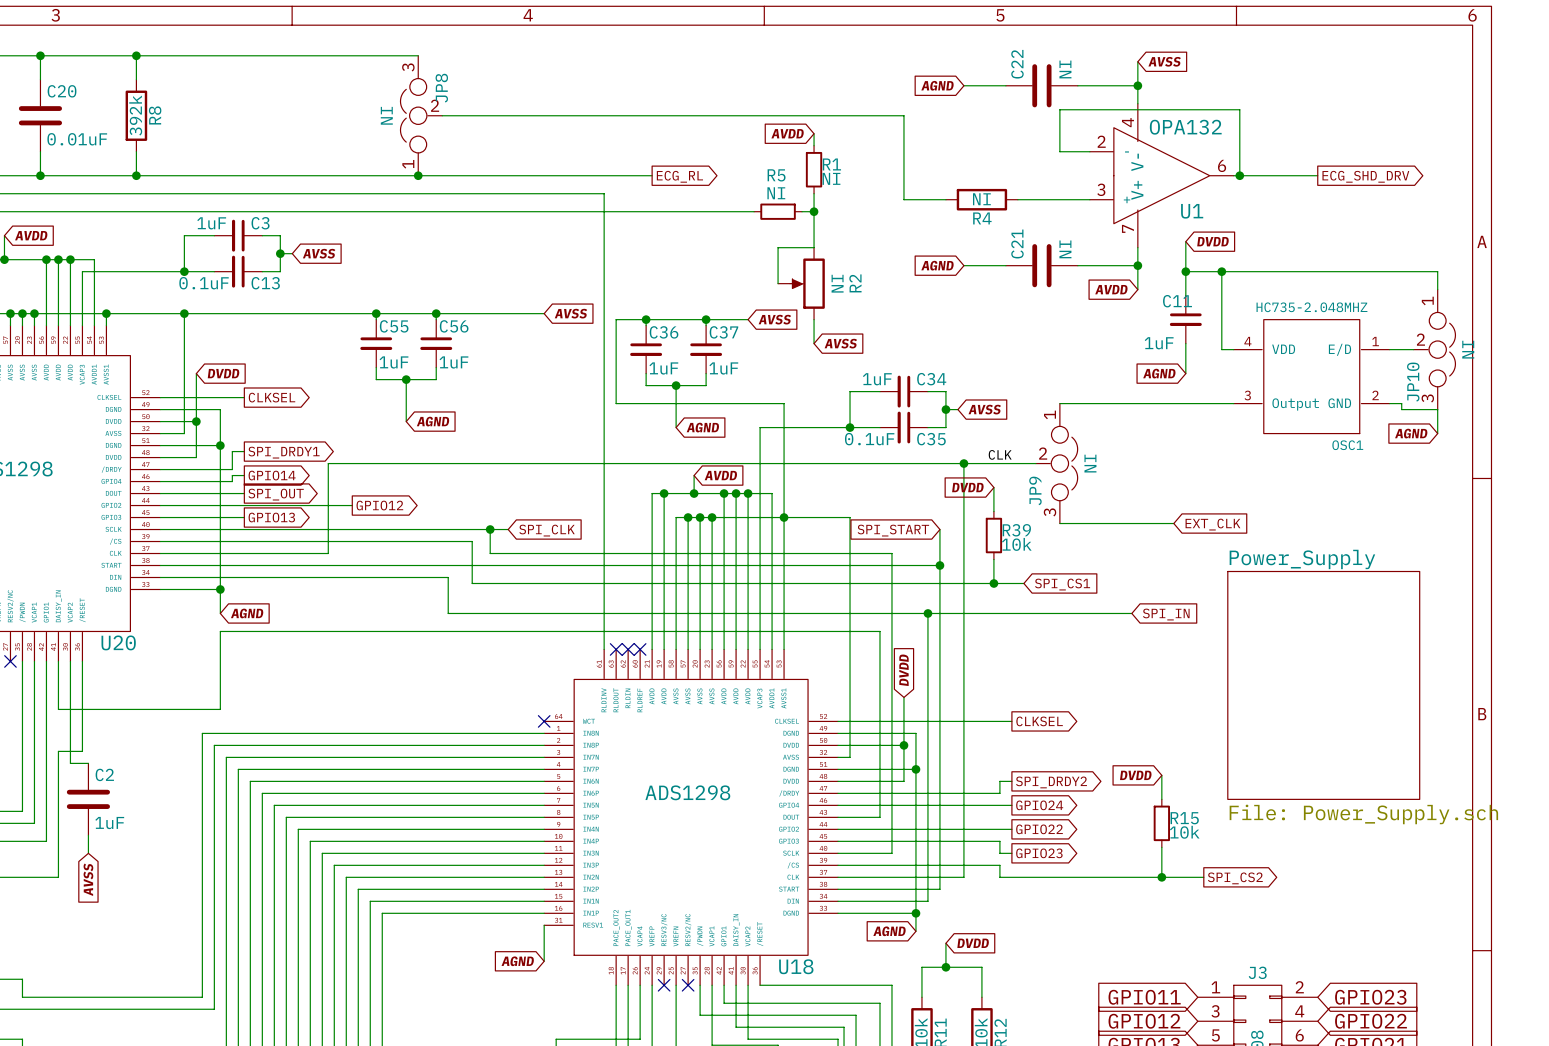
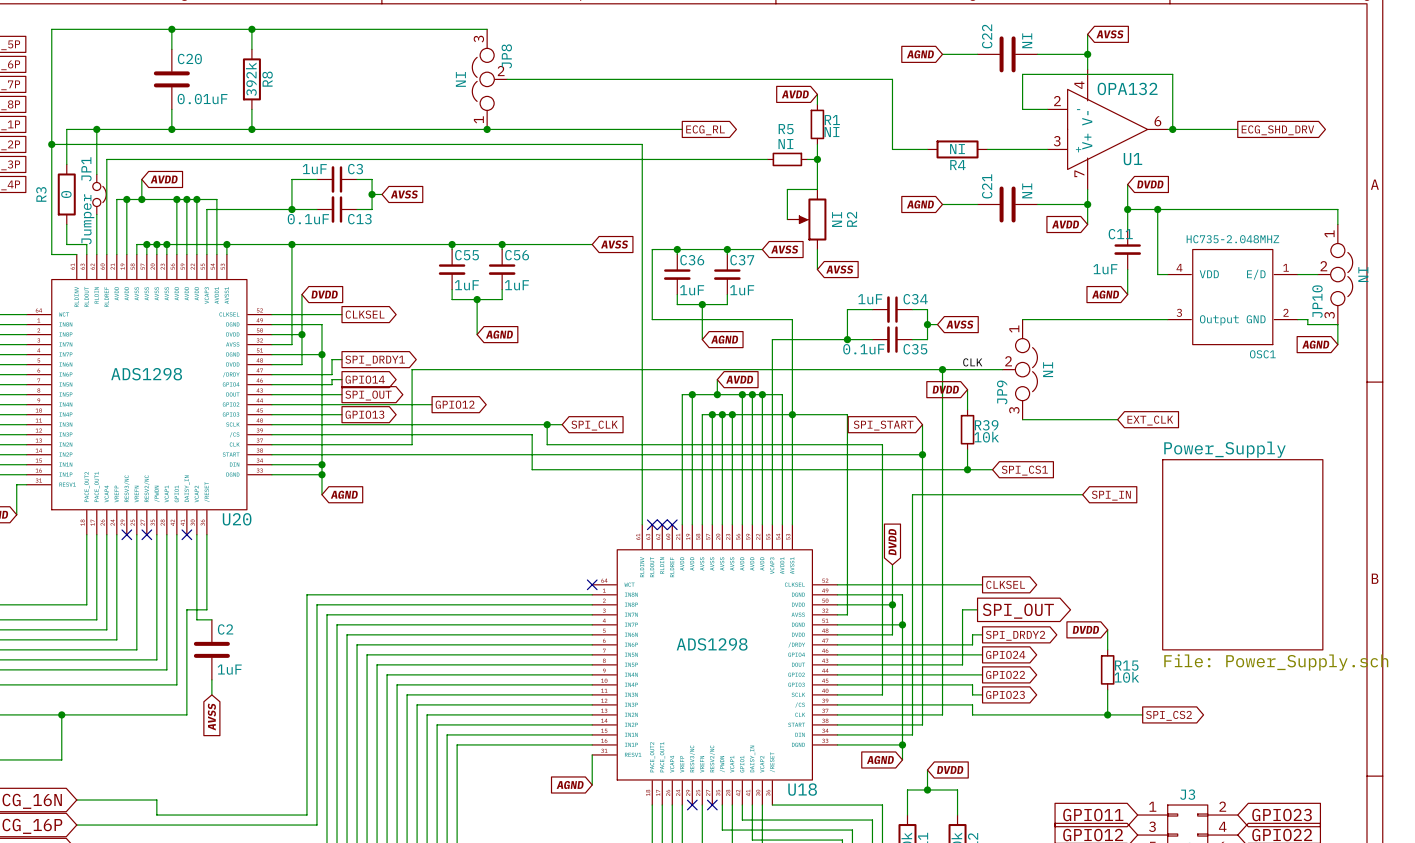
wire: (220, 577) (448, 577) (448, 613) (927, 613) -> none
junction: none -> (321, 464)
junction: (927, 613) -> none
wire: (58, 661) (58, 709) (220, 709) (220, 631) (879, 631) (879, 817) -> (977, 609) (962, 609) (962, 664) (872, 664)
no-connect mark: none -> (186, 534)
global label: none -> SPI_OUT (1018, 611)

